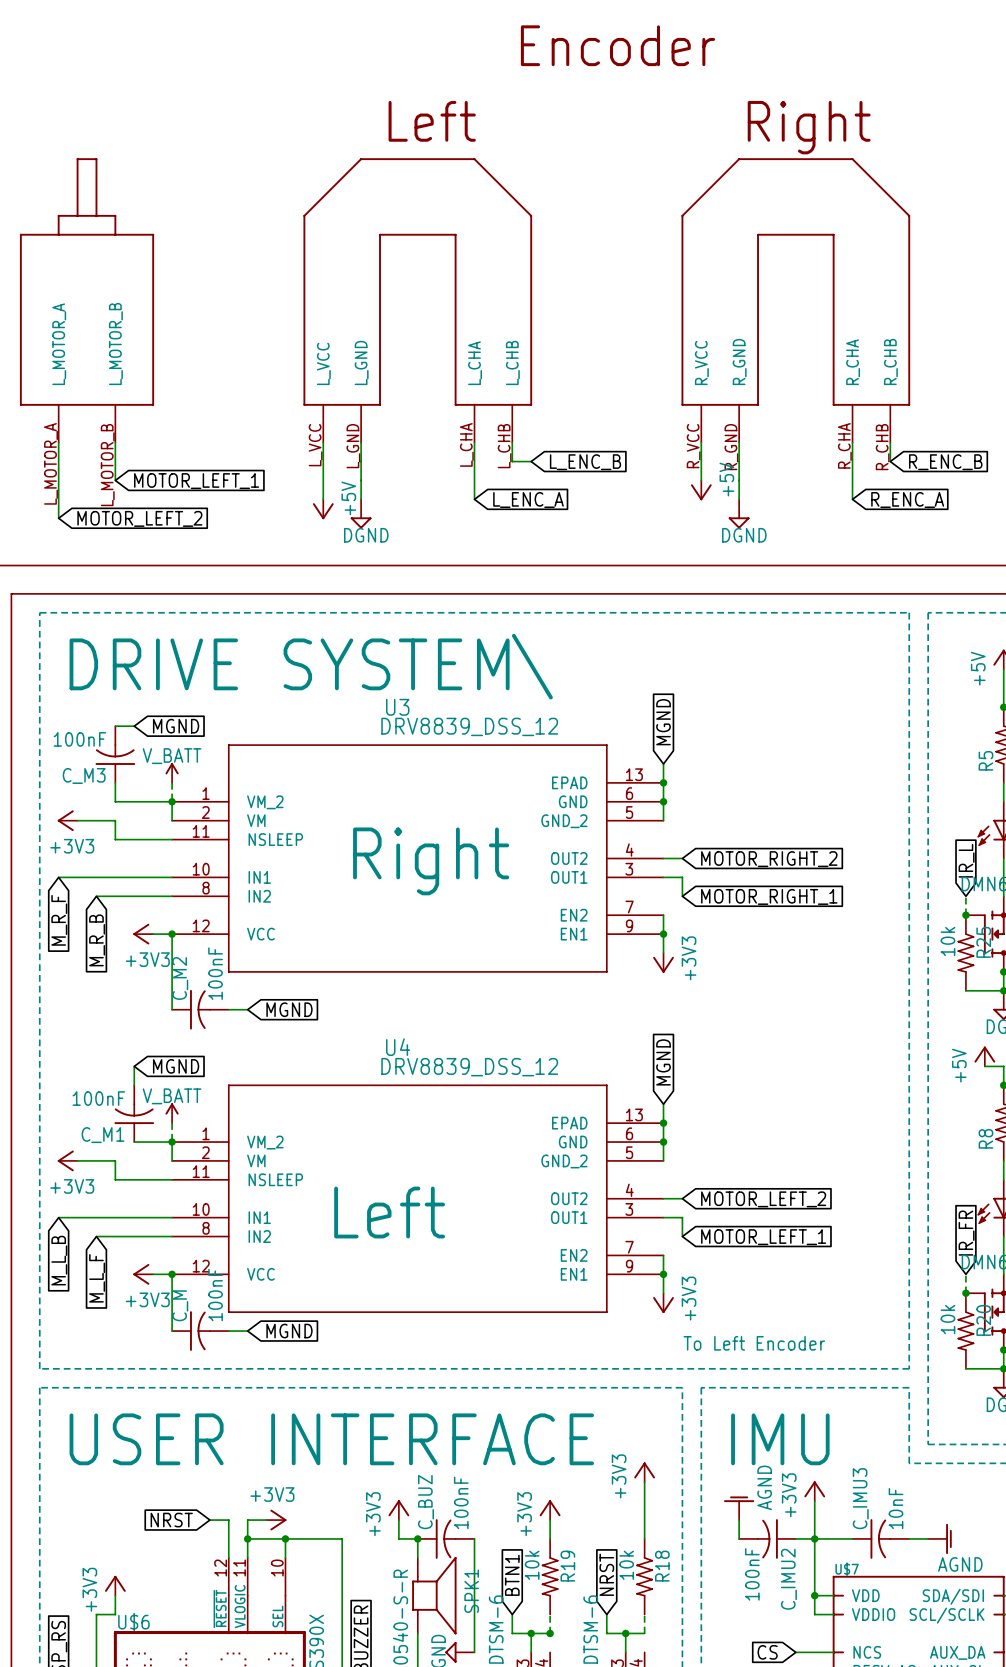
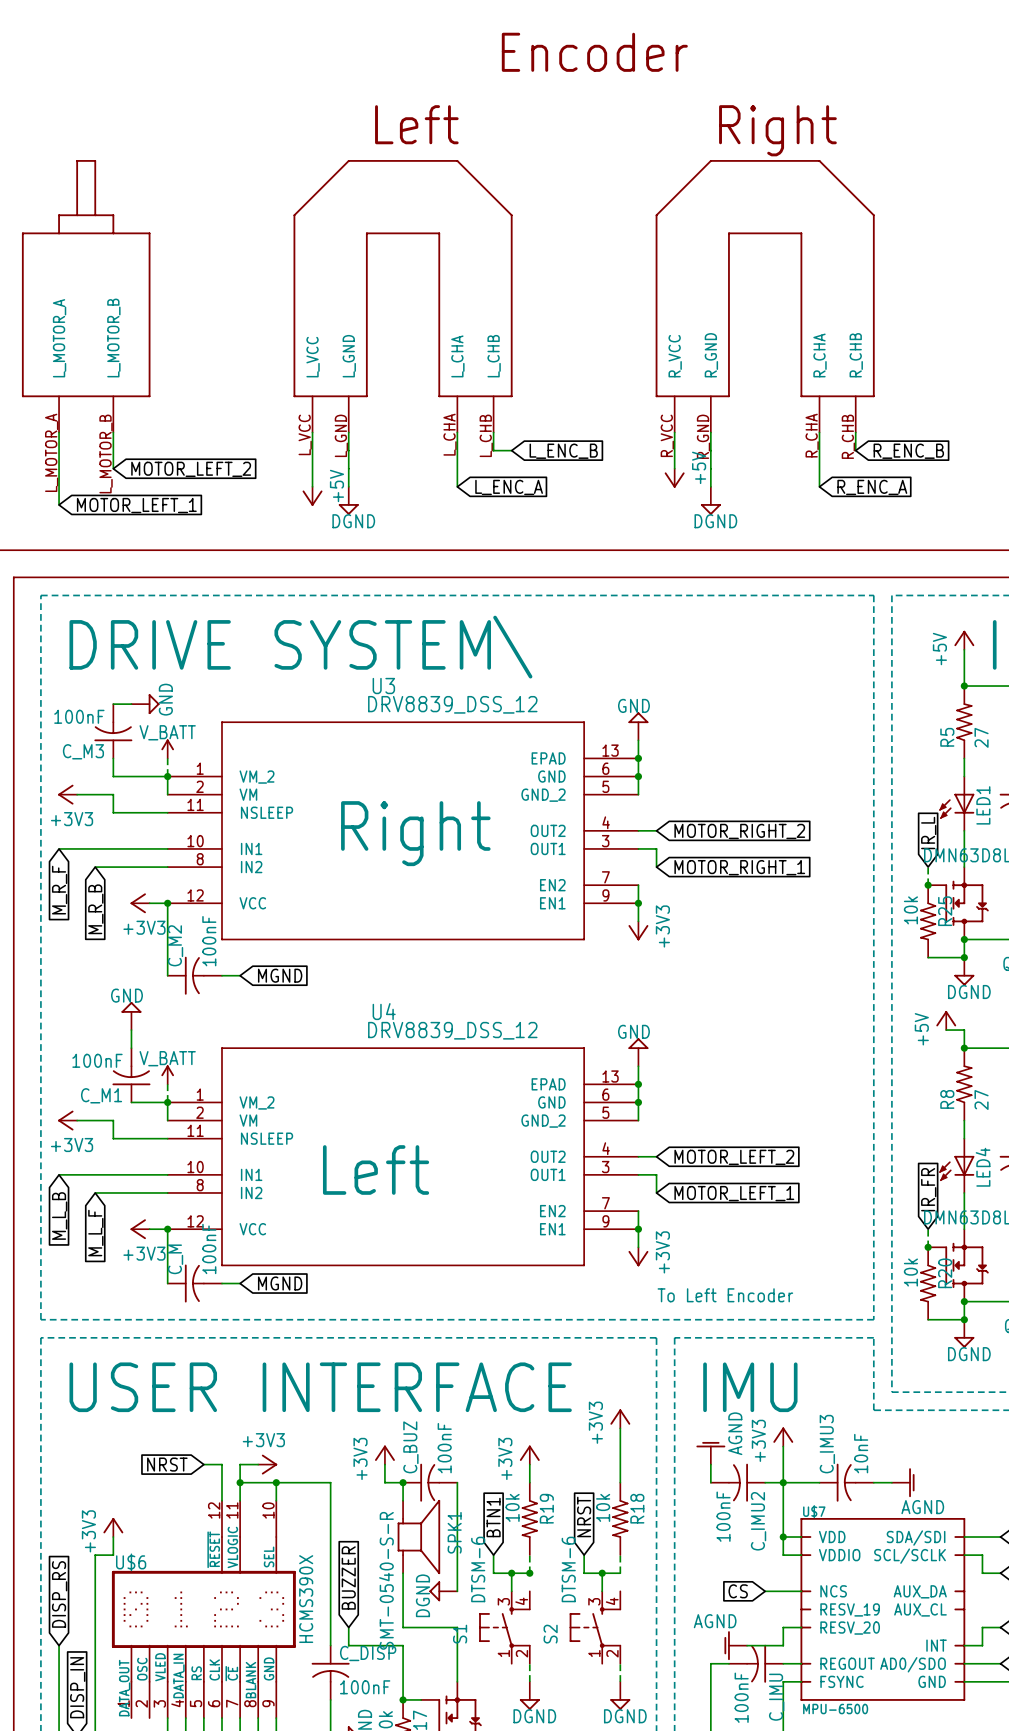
global label: MOTOR_LEFT_1 (196, 481) -> MOTOR_LEFT_2 (191, 469)
global label: MOTOR_LEFT_2 (139, 518) -> MOTOR_LEFT_1 (136, 505)
global label: MGND (663, 722) -> none
power symbol: none -> GND (145, 704)
global label: MGND (176, 726) -> none
power symbol: none -> GND (638, 726)
power symbol: none -> GND (131, 1016)
global label: MGND (663, 1062) -> none
global label: MGND (176, 1066) -> none
power symbol: none -> GND (638, 1052)

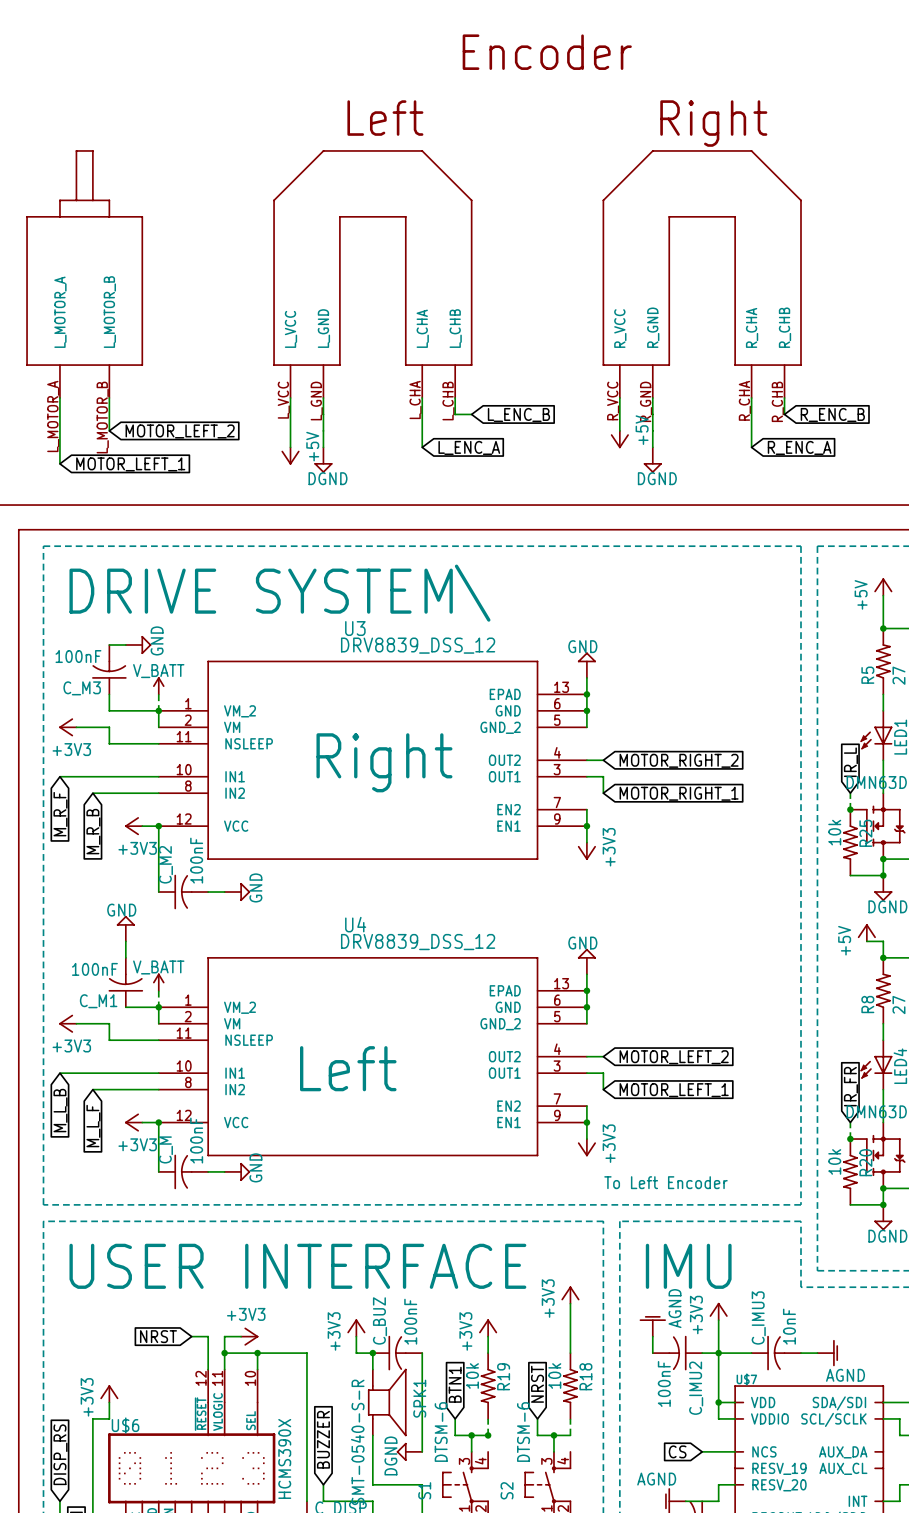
power symbol: none -> GND (237, 892)
global label: MGND (280, 975) -> none
power symbol: none -> GND (237, 1171)
global label: MGND (280, 1283) -> none

